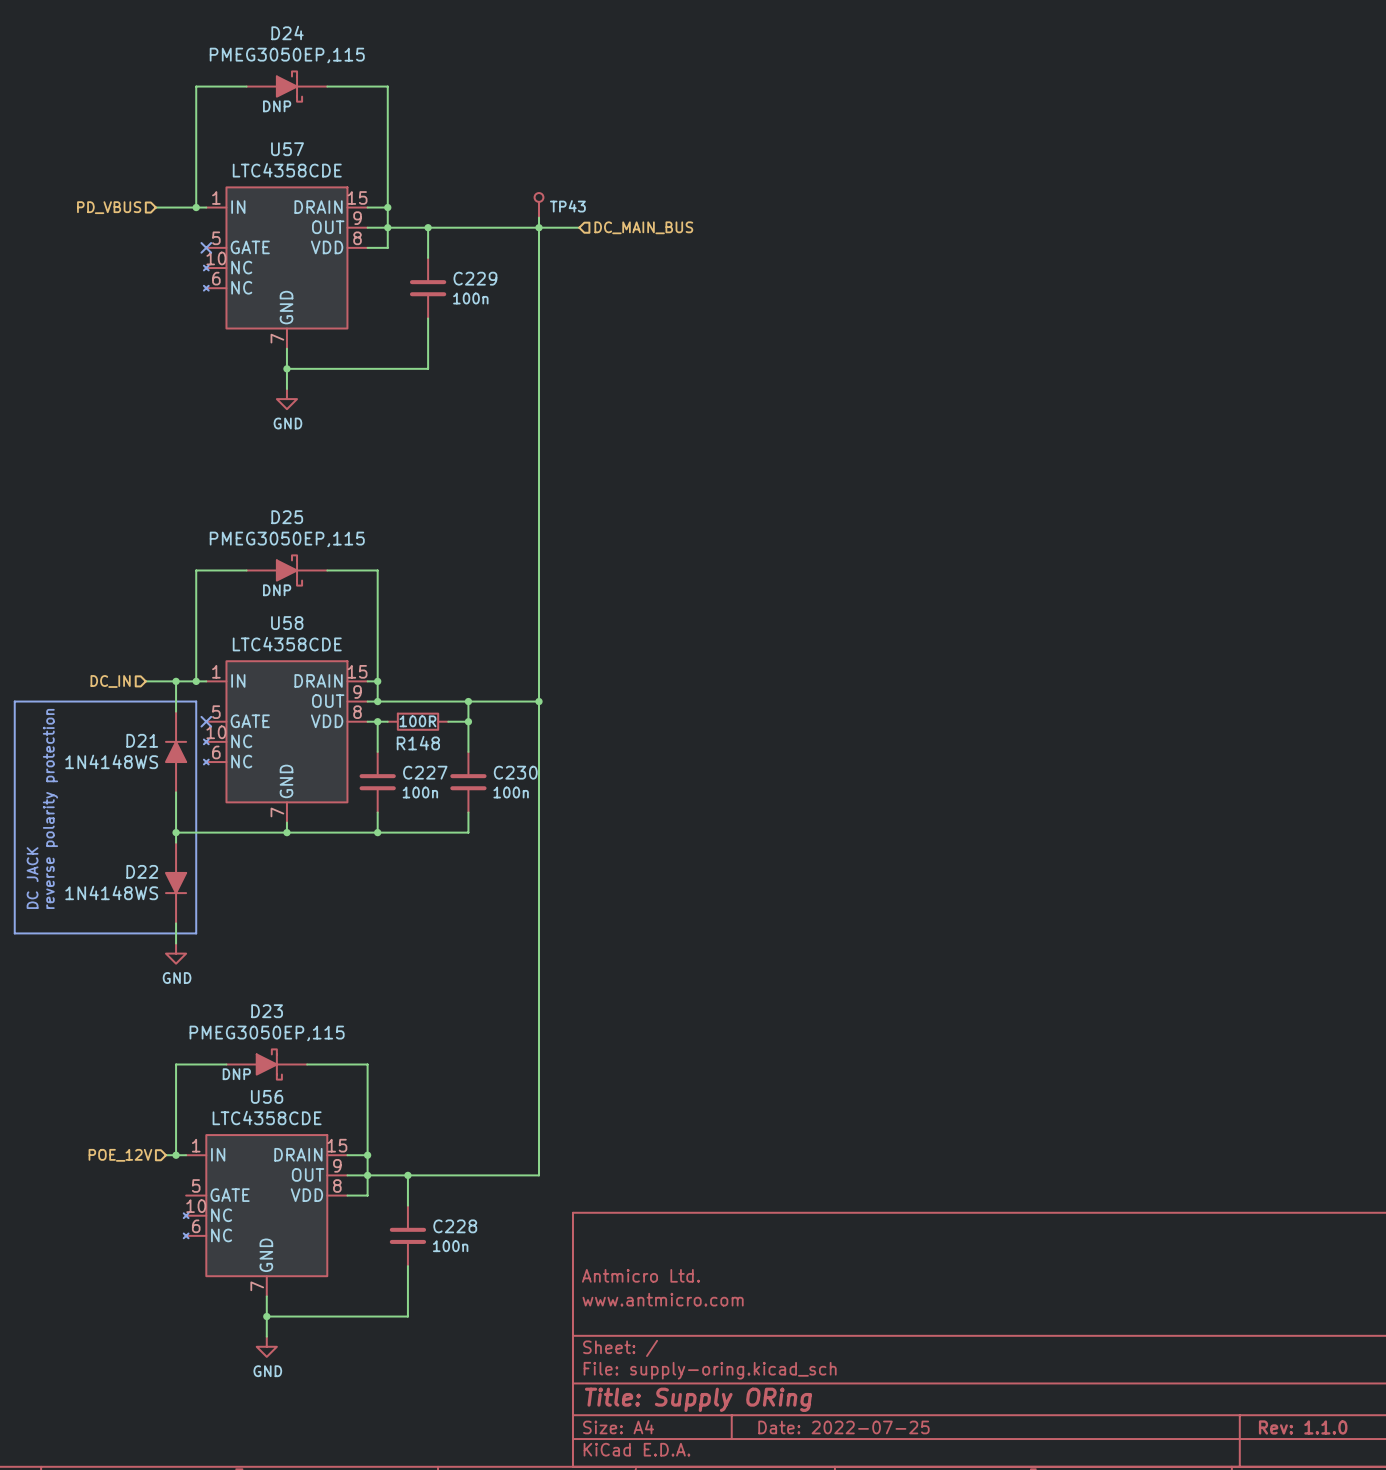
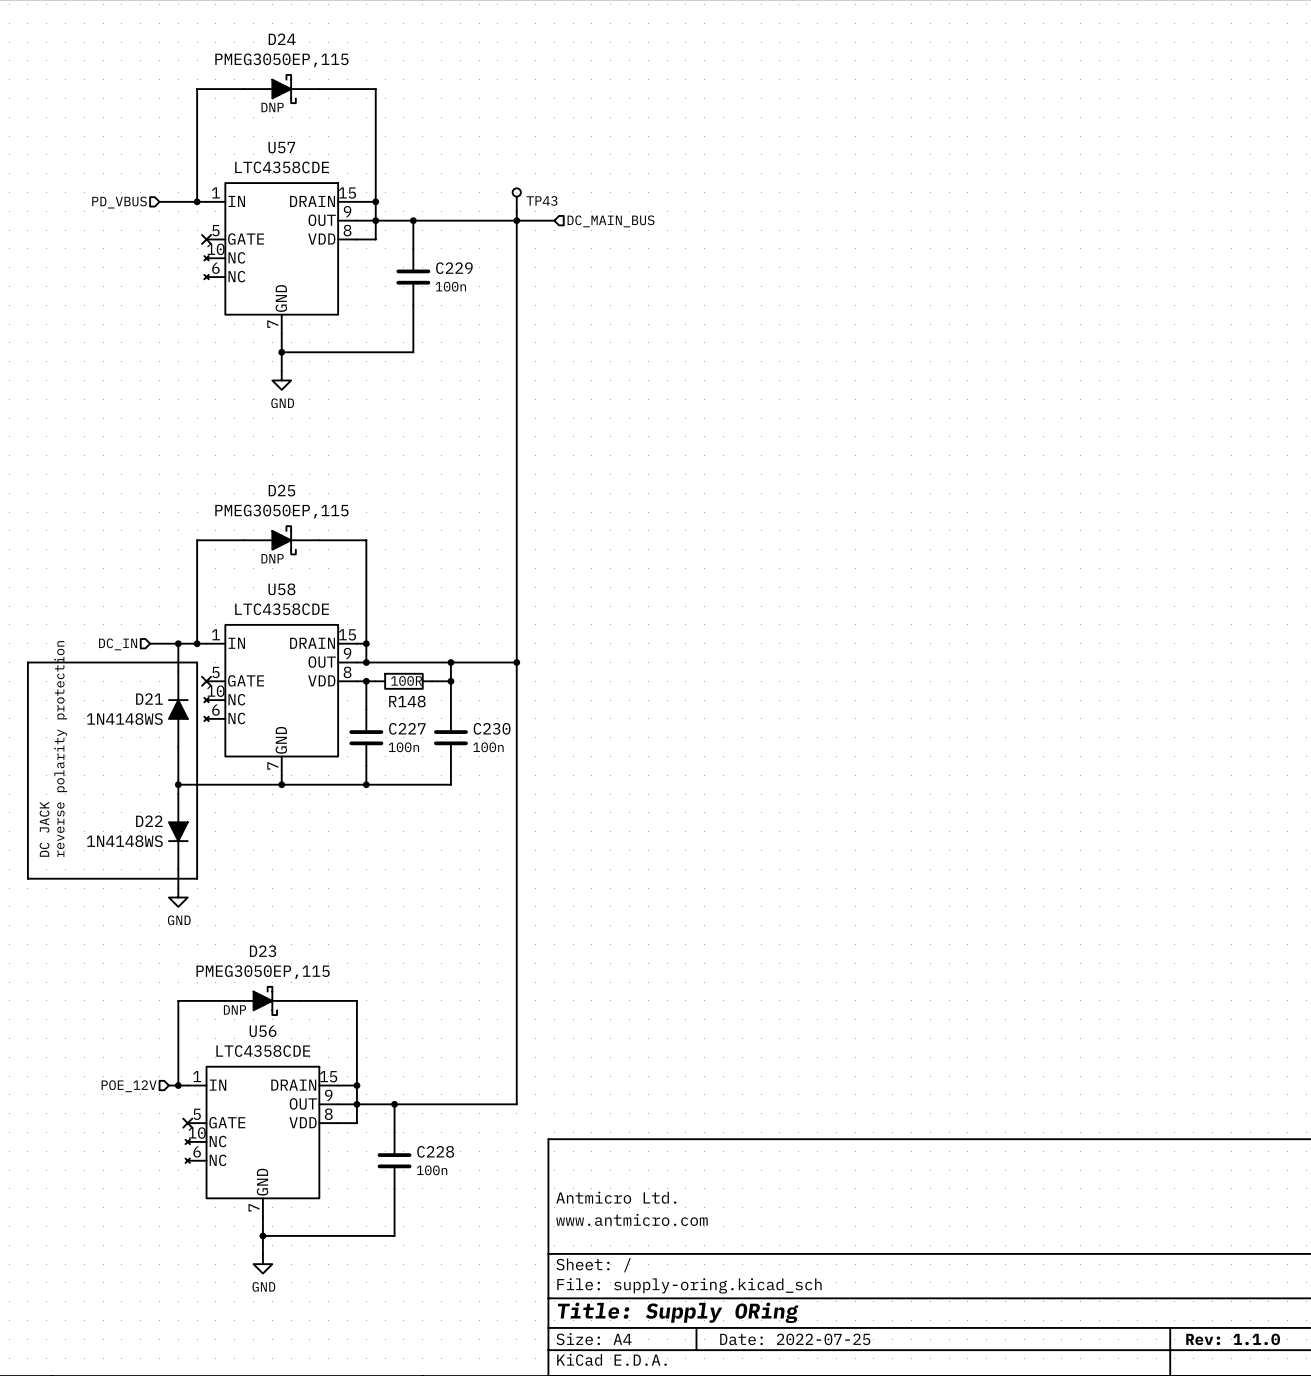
no-connect mark: none -> (187, 1123)

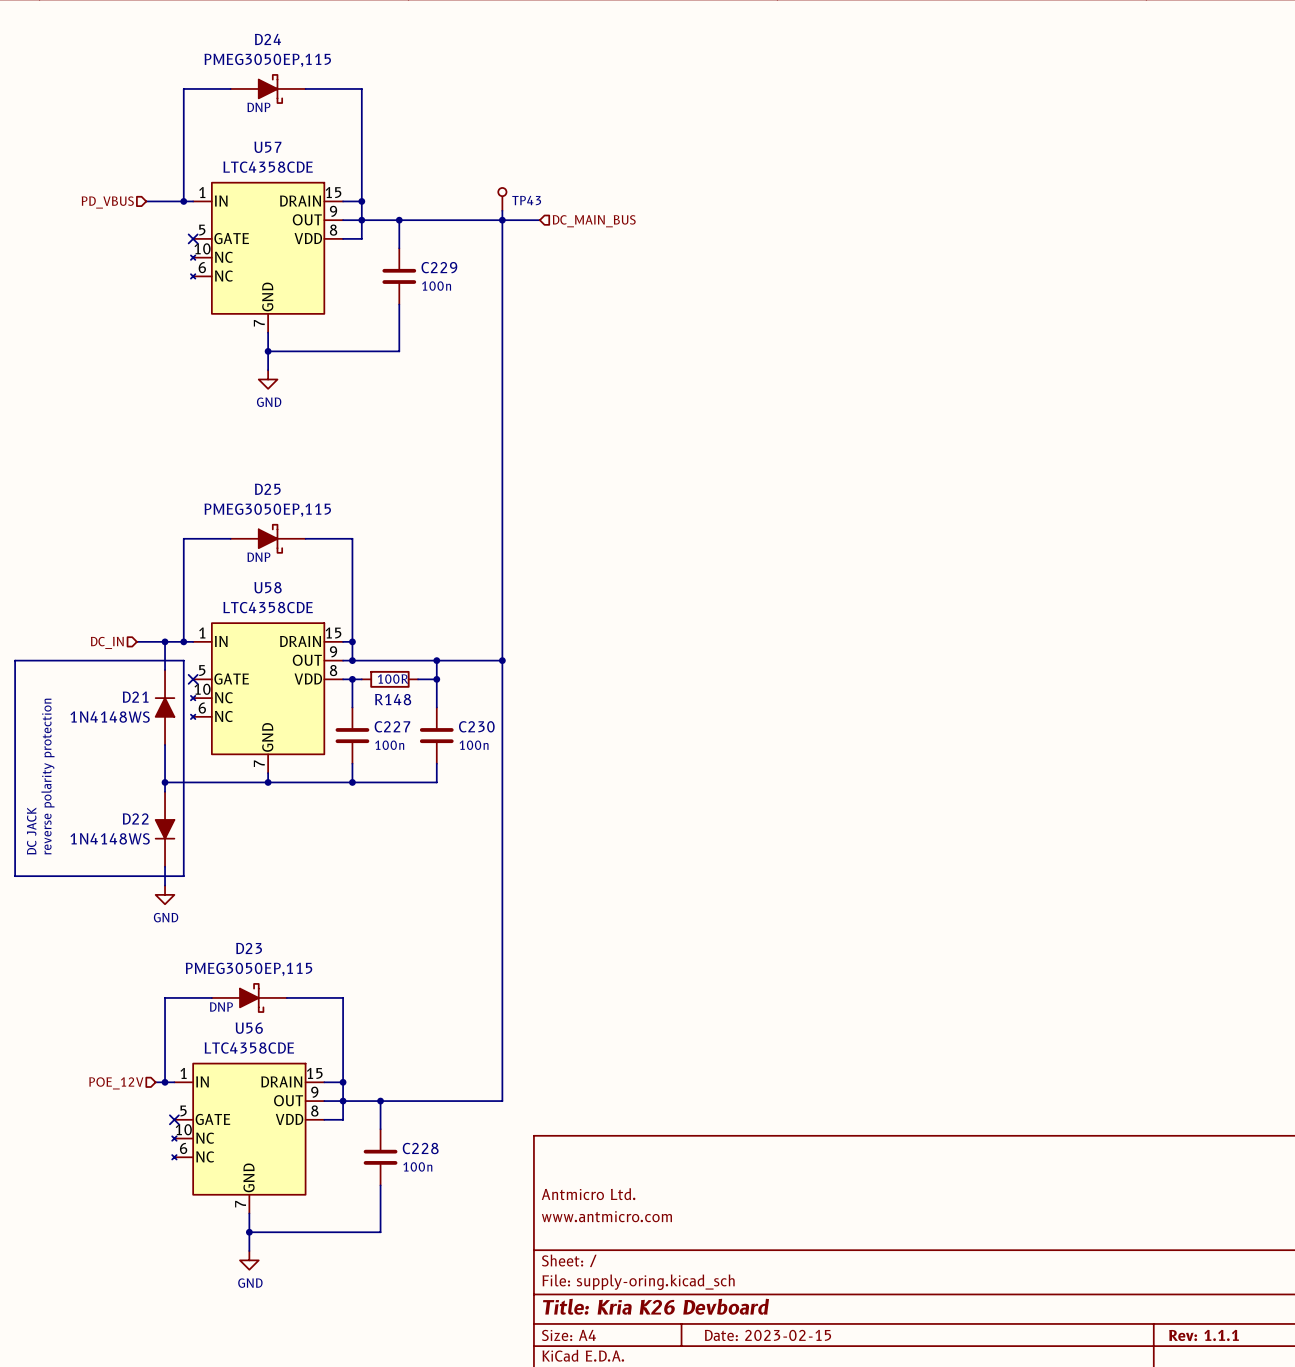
title block: Title: Supply ORing (678, 1312) -> Title: Kria K26 Devboard (656, 1306)
title block: Date: 2022-07-25 (795, 1339) -> Date: 2023-02-15 (768, 1335)
title block: Rev: 1.1.0 (1233, 1339) -> Rev: 1.1.1 (1204, 1335)

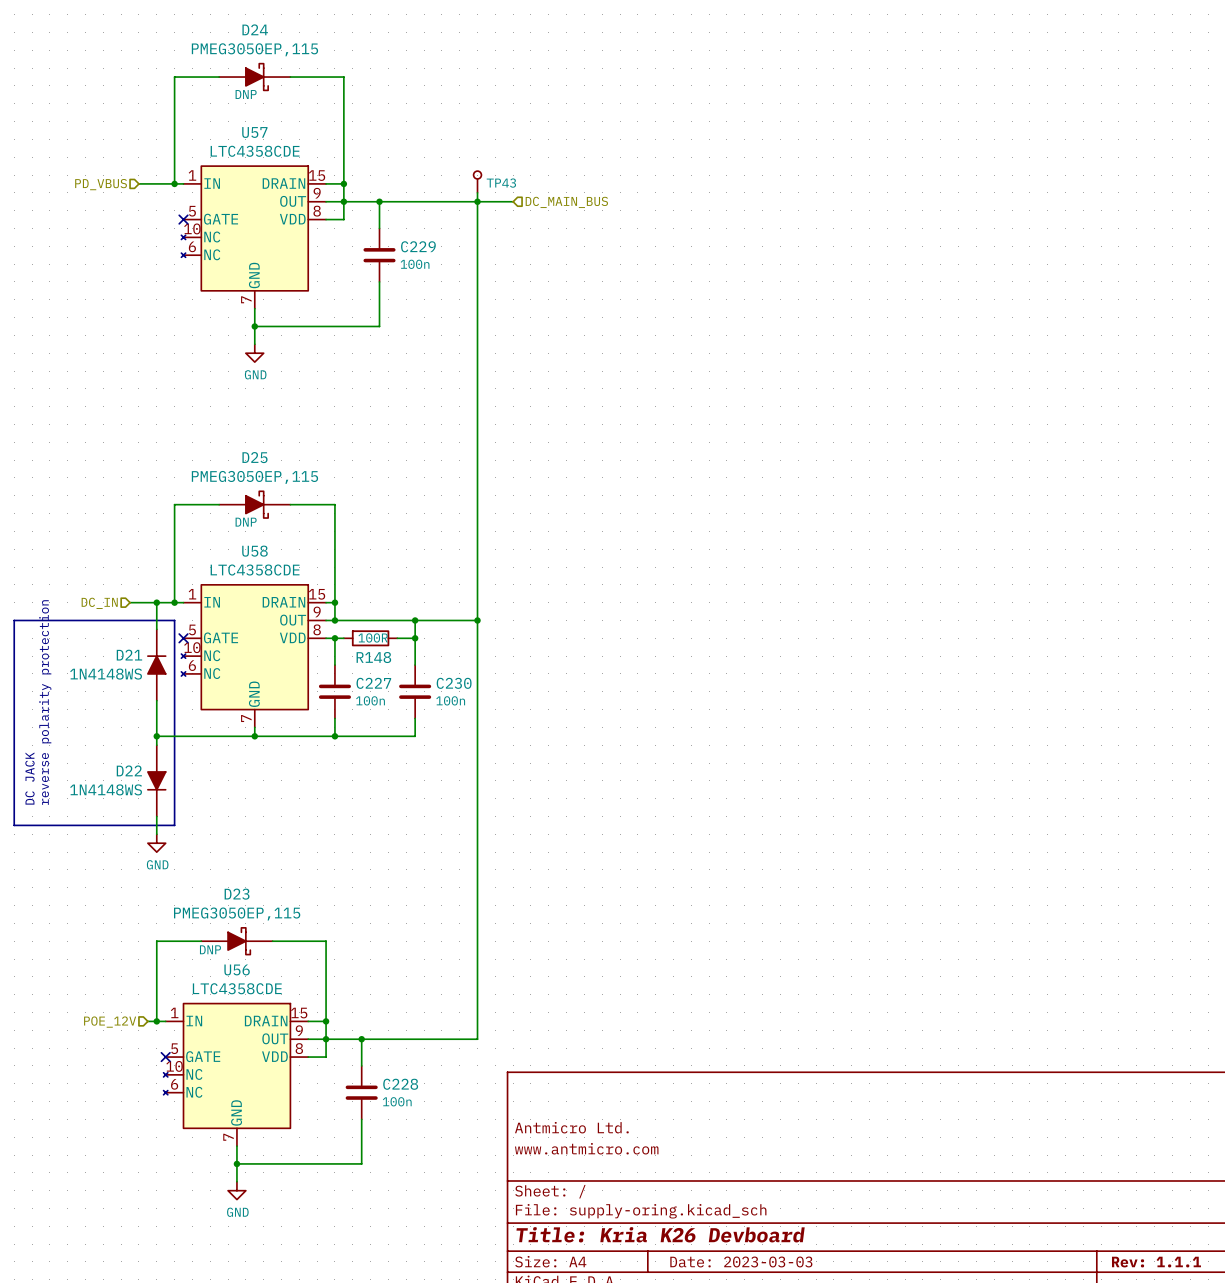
title block: Date: 2023-02-15 (768, 1335) -> Date: 2023-03-03 (741, 1261)

